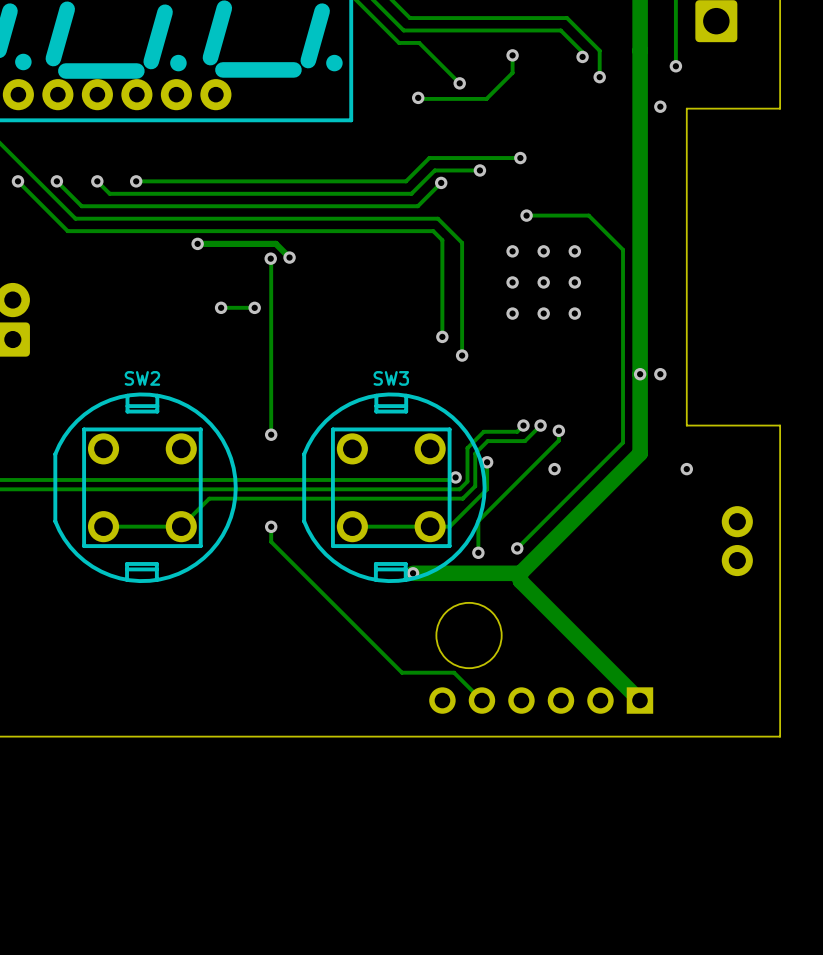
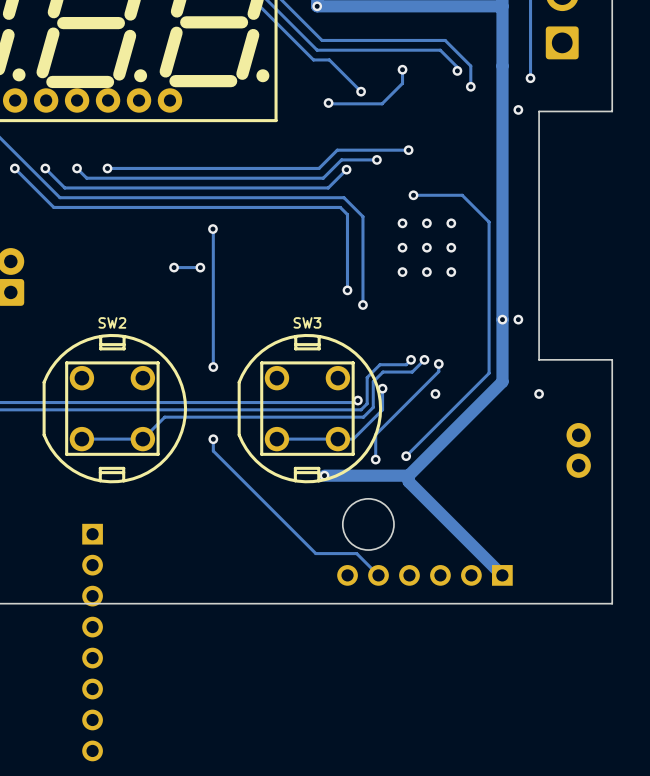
via: (197, 243) -> none
track: (197, 244) (275, 243) (289, 257) -> none
via: (289, 257) -> none
part: none -> (92, 642)

